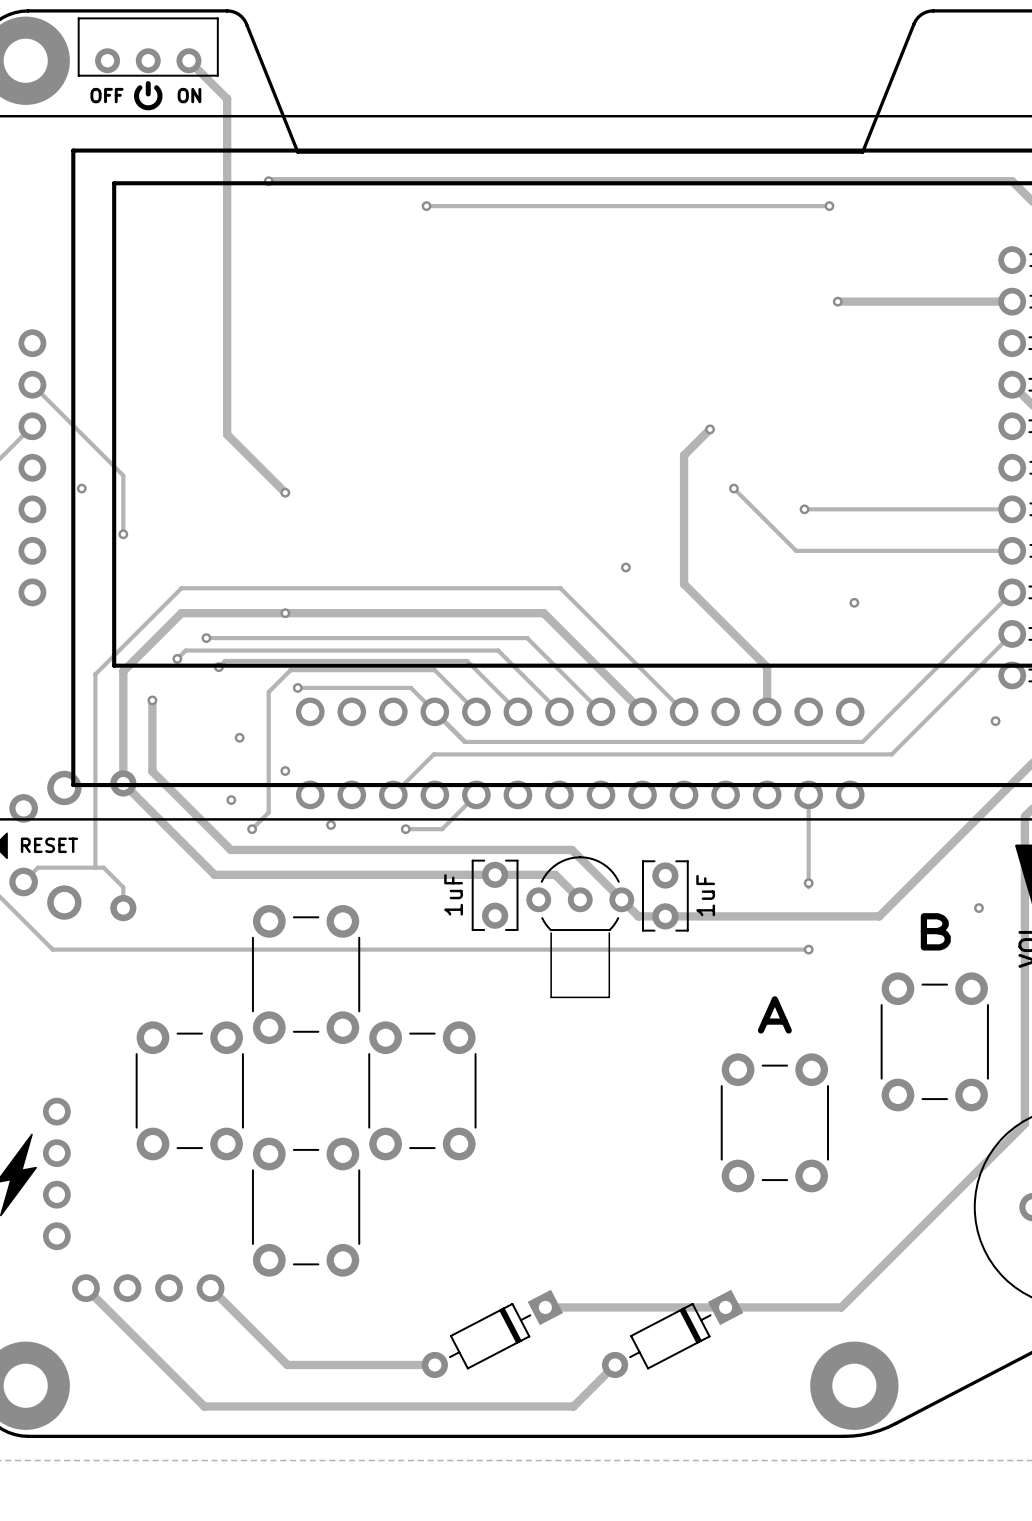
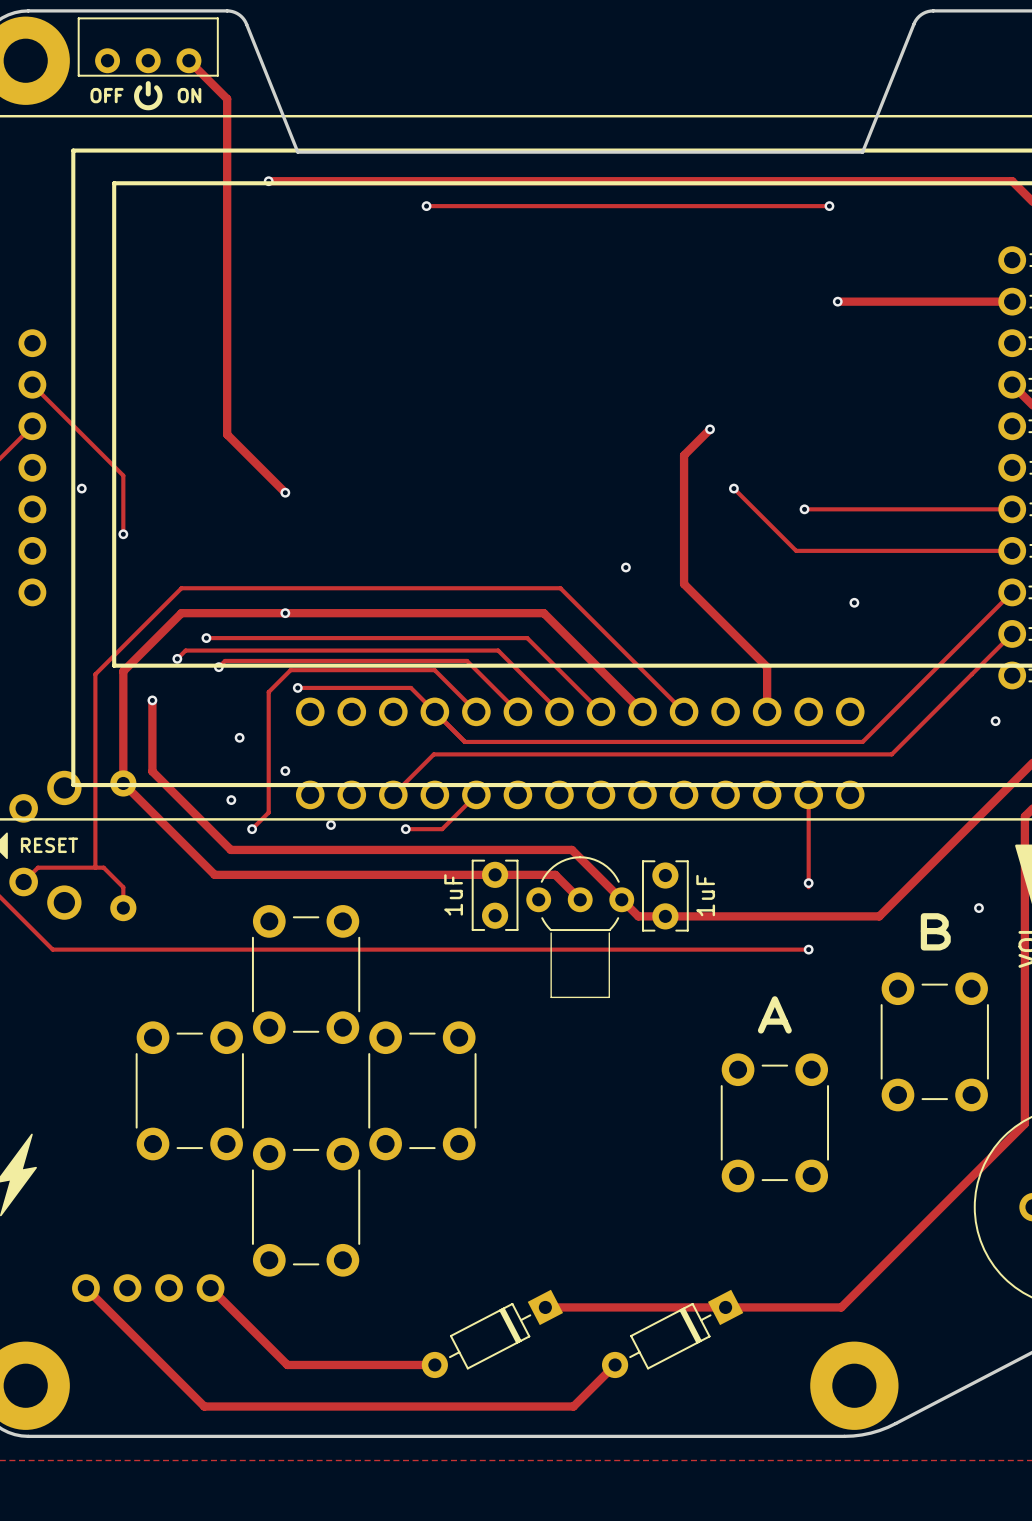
part: (56, 1173) -> none

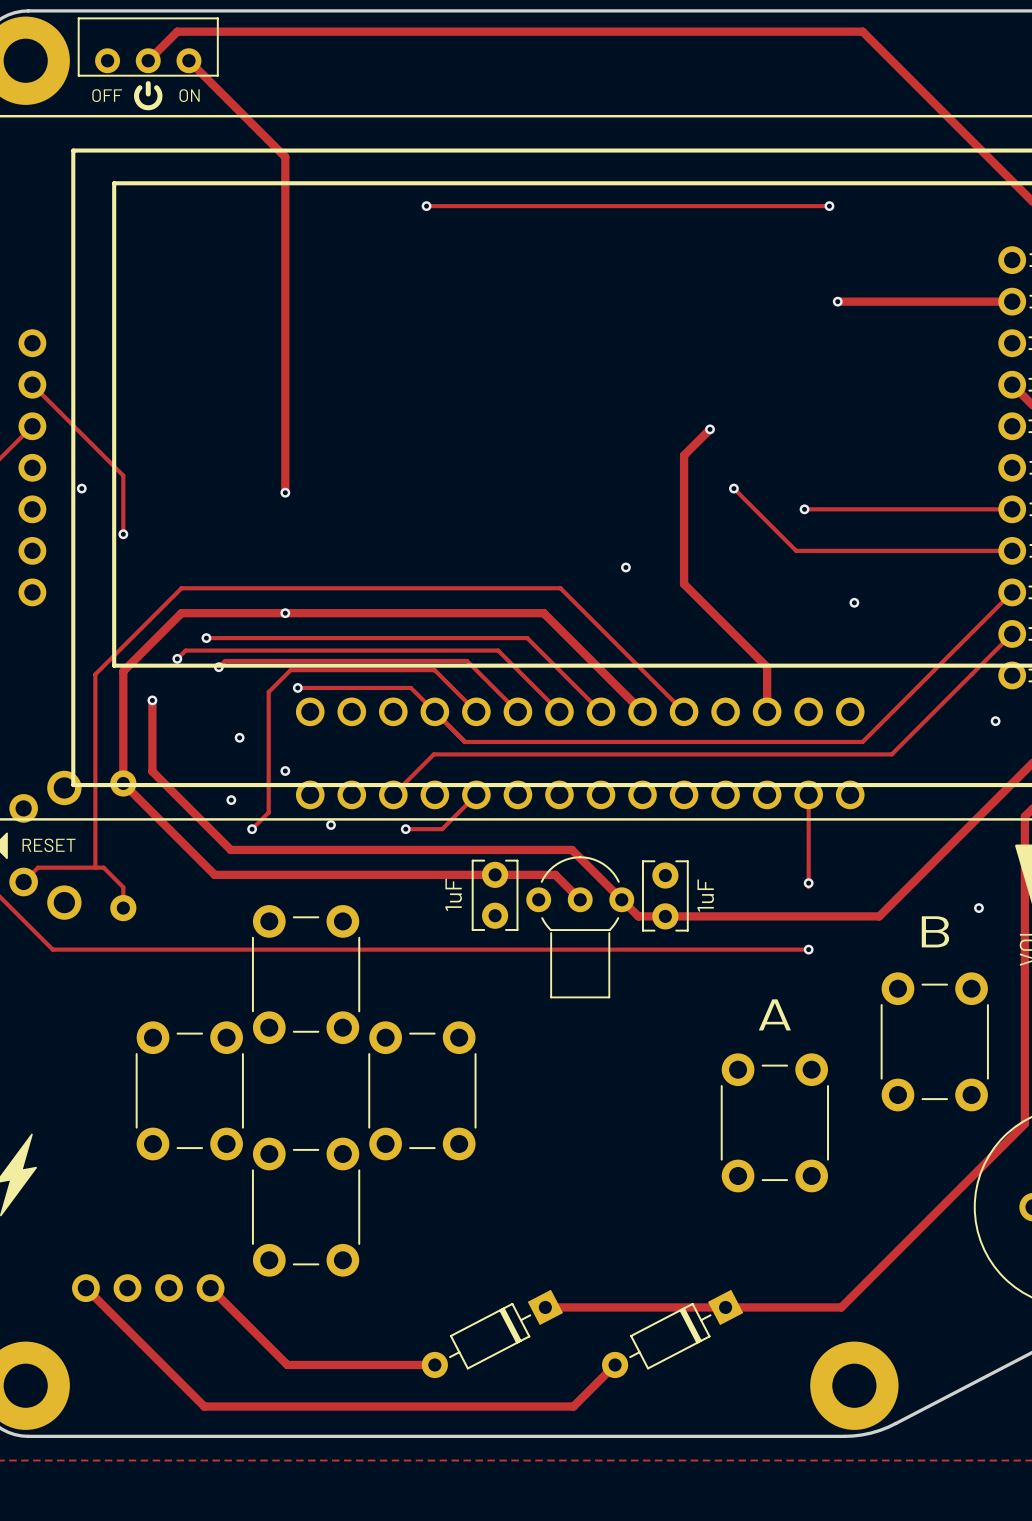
board edge: (227, 10) (236, 13) (245, 22) (297, 152) (862, 152) (914, 22) (921, 14) (933, 10) -> (227, 10) (933, 10)
track: (227, 98) (227, 434) (285, 492) -> (227, 98) (285, 157) (285, 492)
track: (268, 181) (1012, 181) -> (148, 60) (177, 31) (862, 31) (1012, 181)
via: (268, 181) -> none

